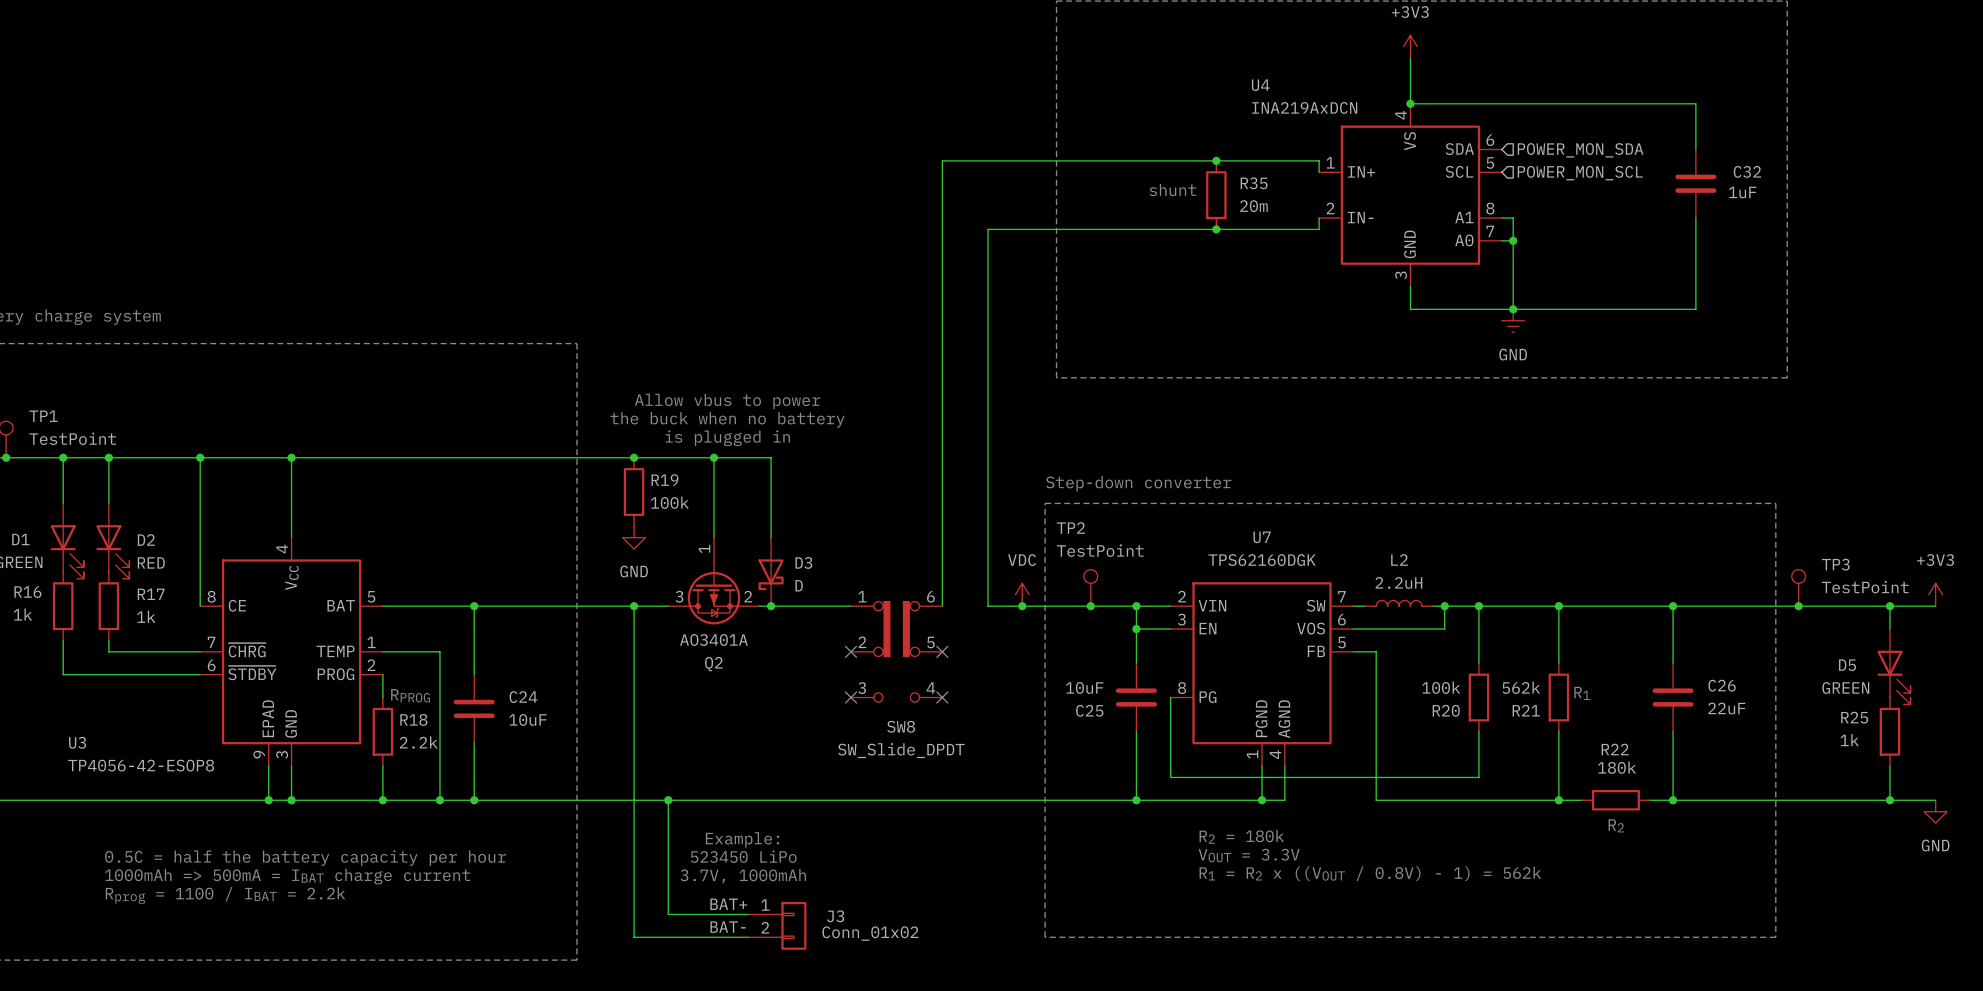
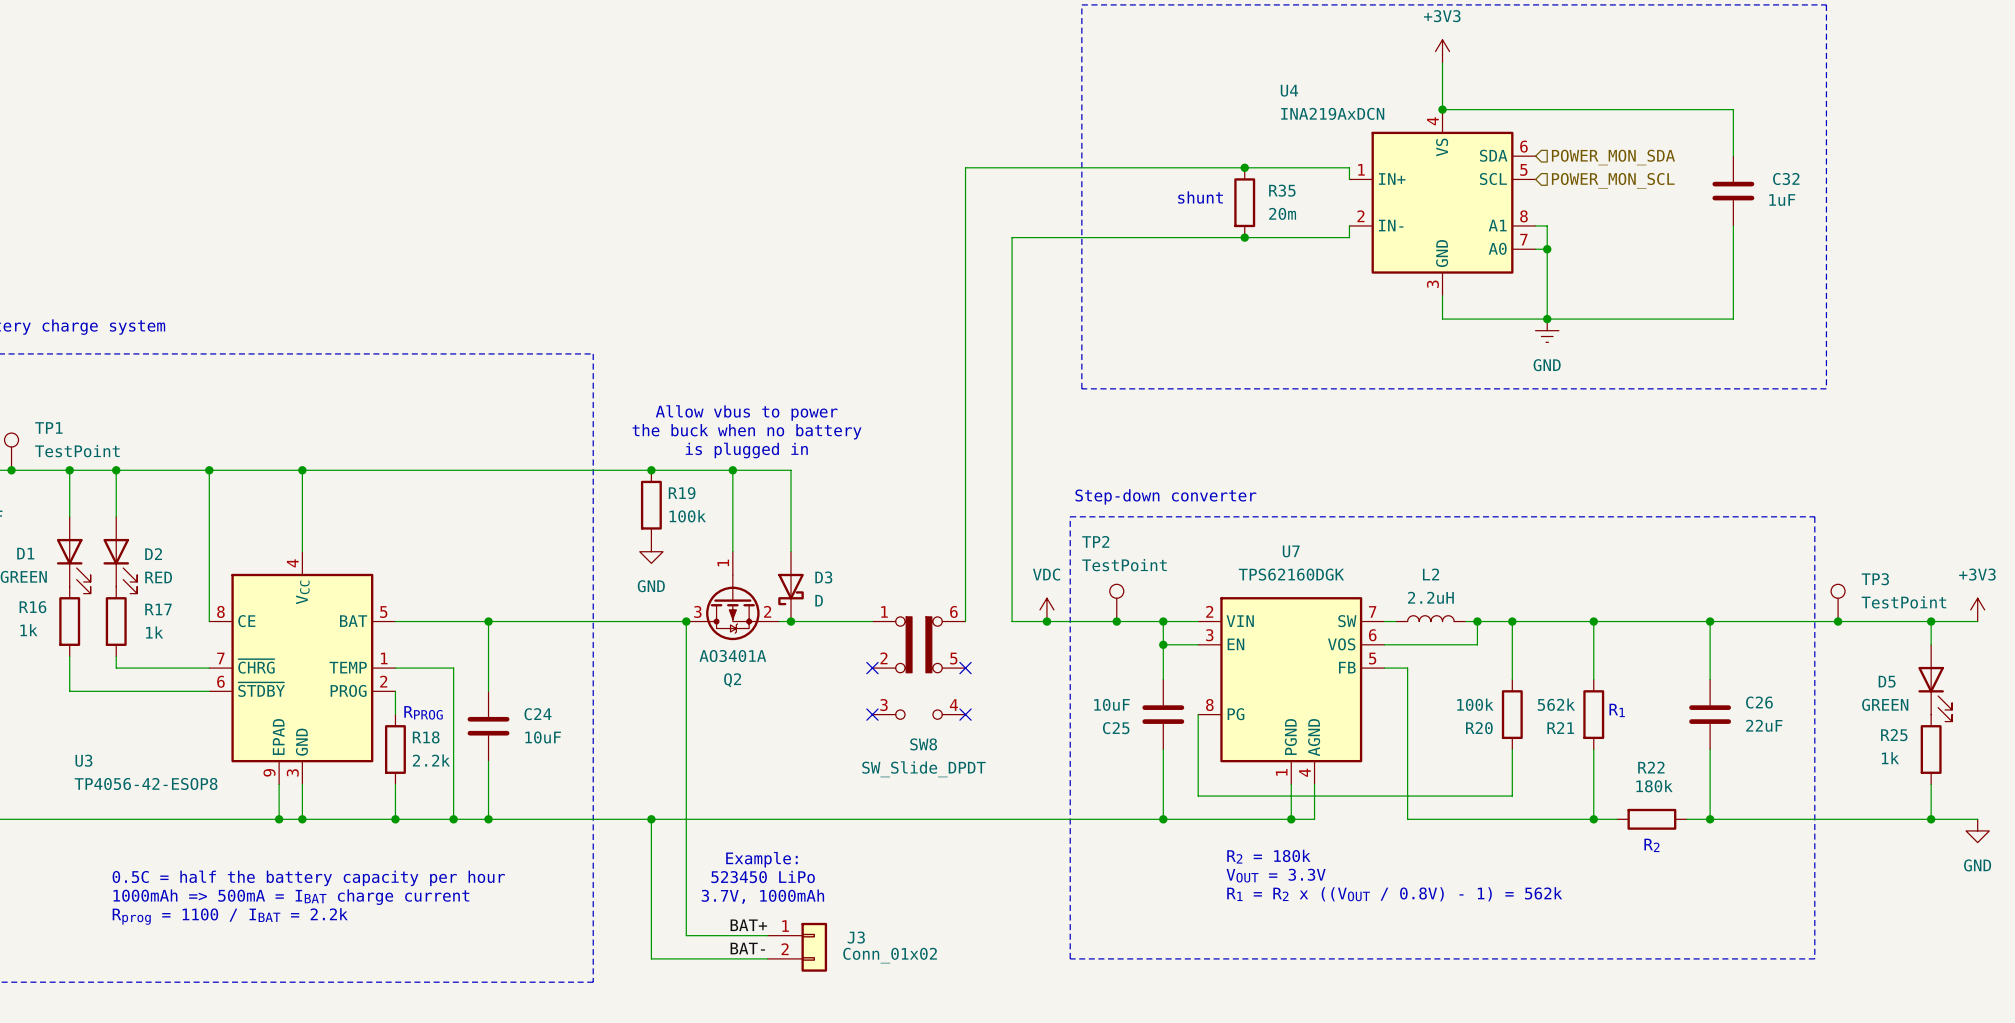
wire: (634, 606) (634, 800) -> (686, 621) (686, 819)
junction position: (634, 606) -> (686, 621)
junction position: (668, 800) -> (651, 819)

